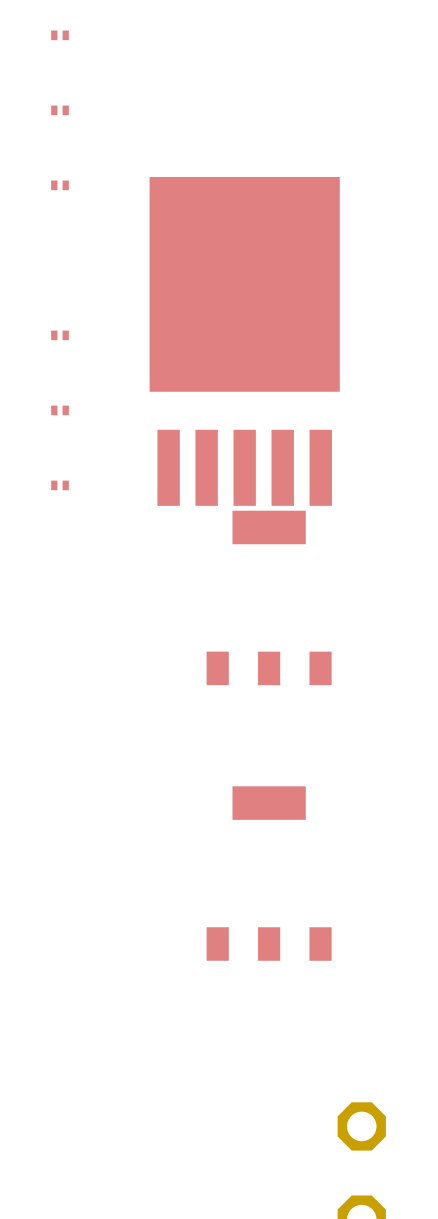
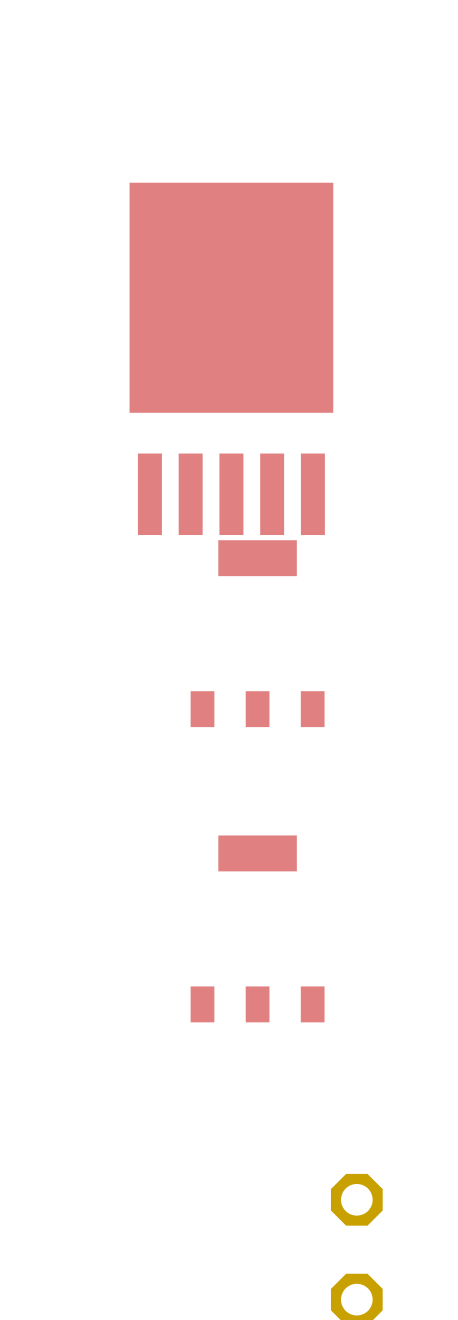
part: (60, 35) -> none
part: (60, 110) -> none
part: (60, 185) -> none
part: (60, 335) -> none
part: (60, 410) -> none
part: (60, 485) -> none

